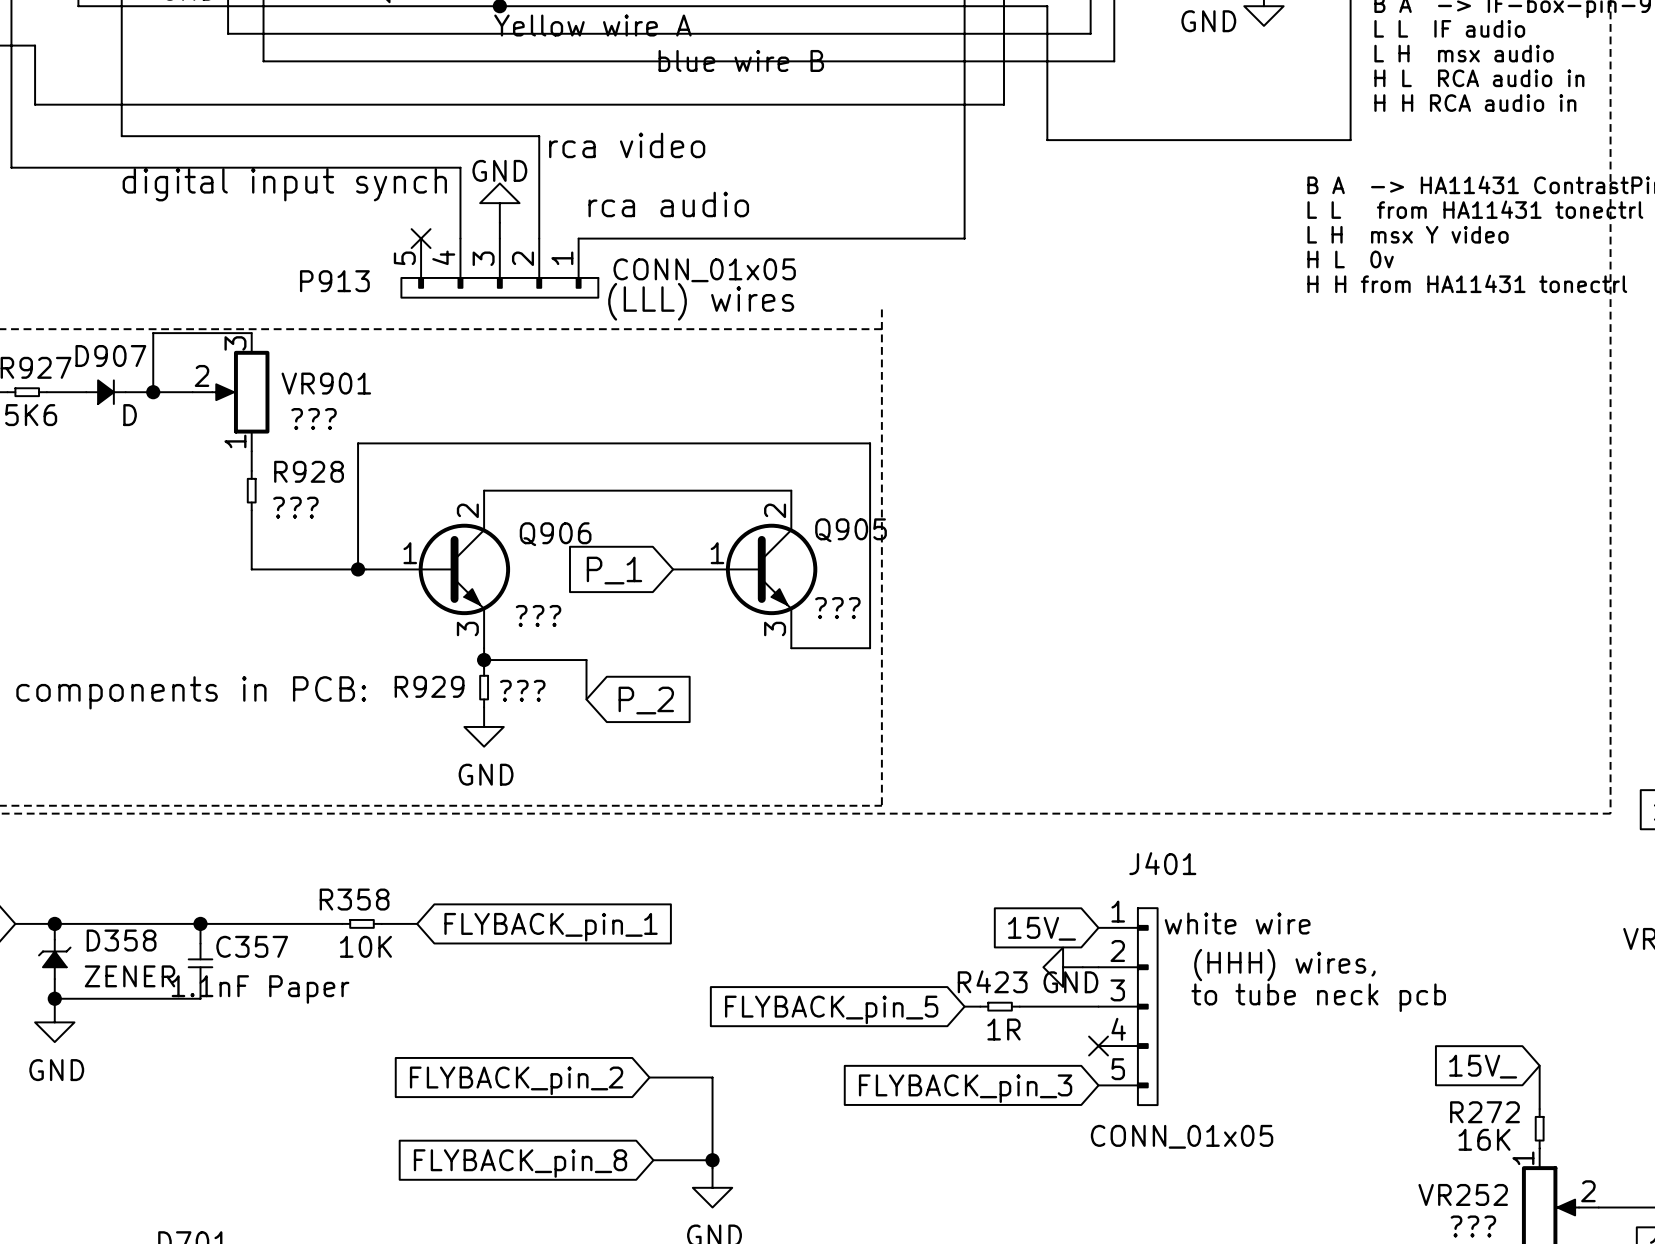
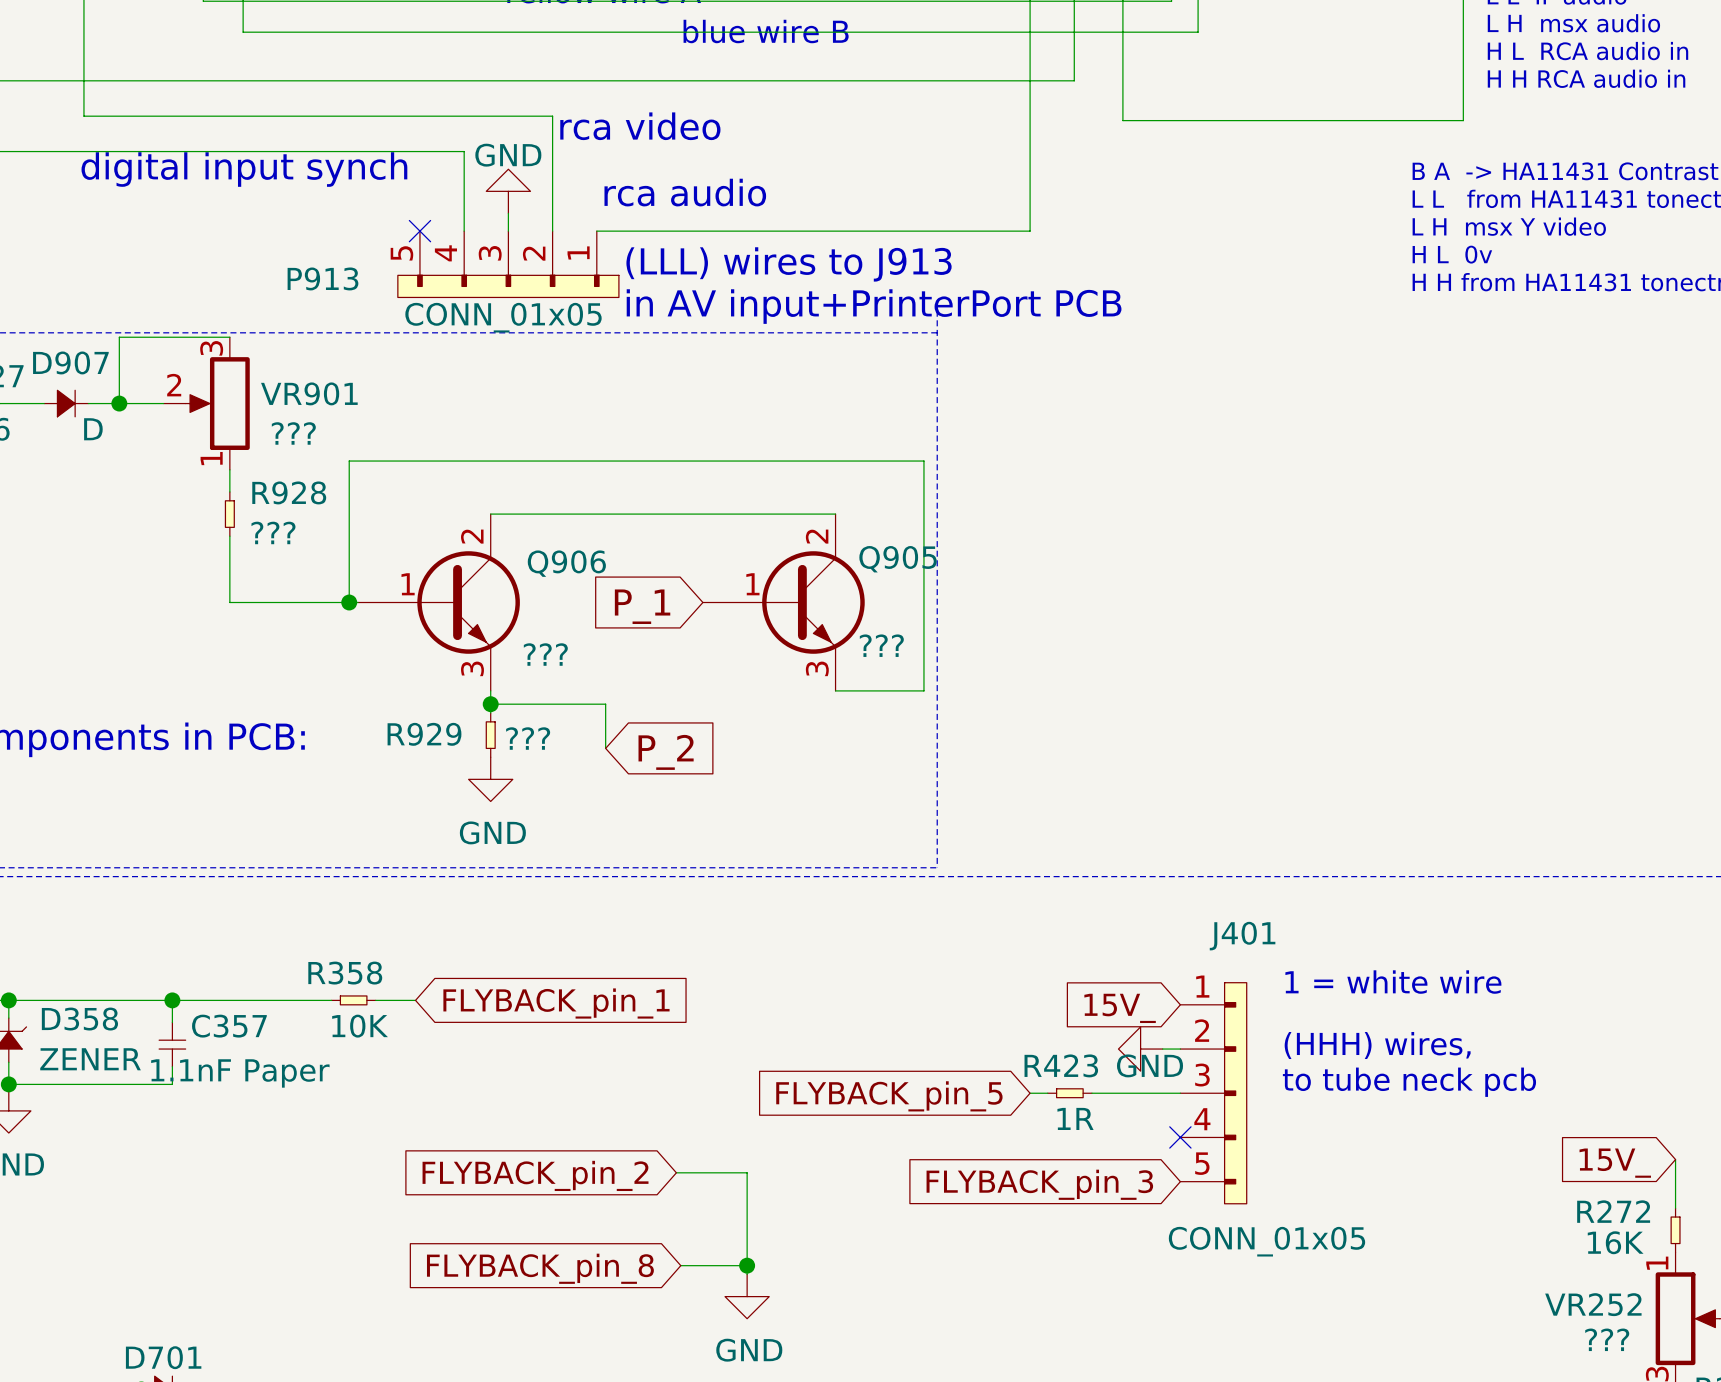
text: none -> (LLL) wires to J913 (789, 264)
P913 value position: CONN_01x05 (704, 270) -> CONN_01x05 (503, 317)
text: (LLL) wires (701, 301) -> in AV input+PrinterPort PCB (874, 306)
text: white wire (1237, 923) -> 1 = white wire (1393, 982)

